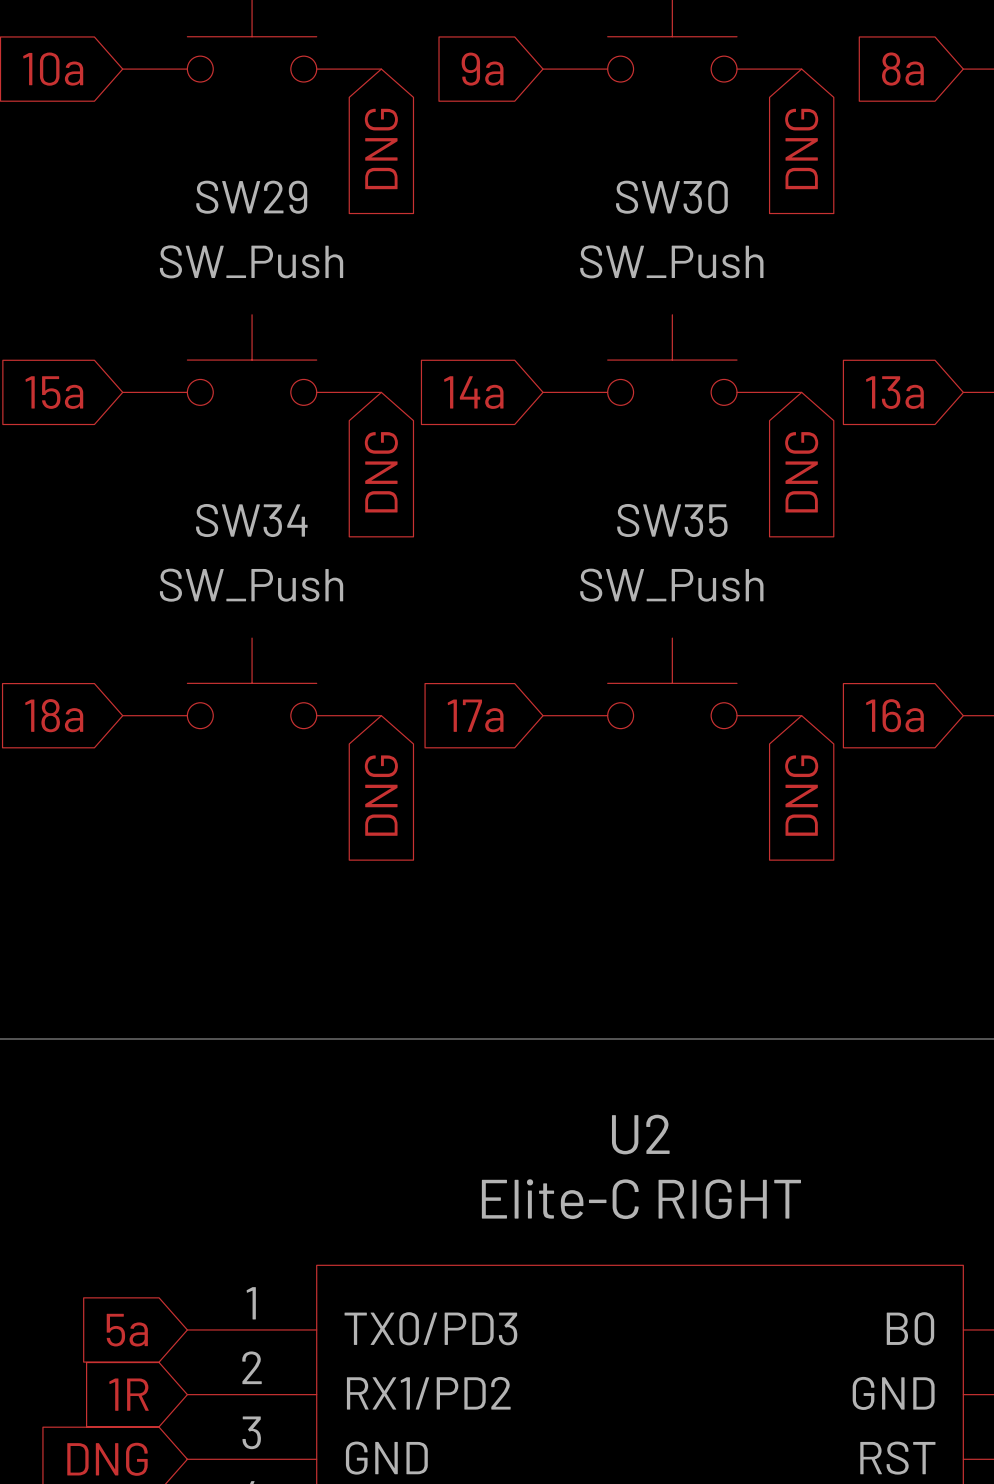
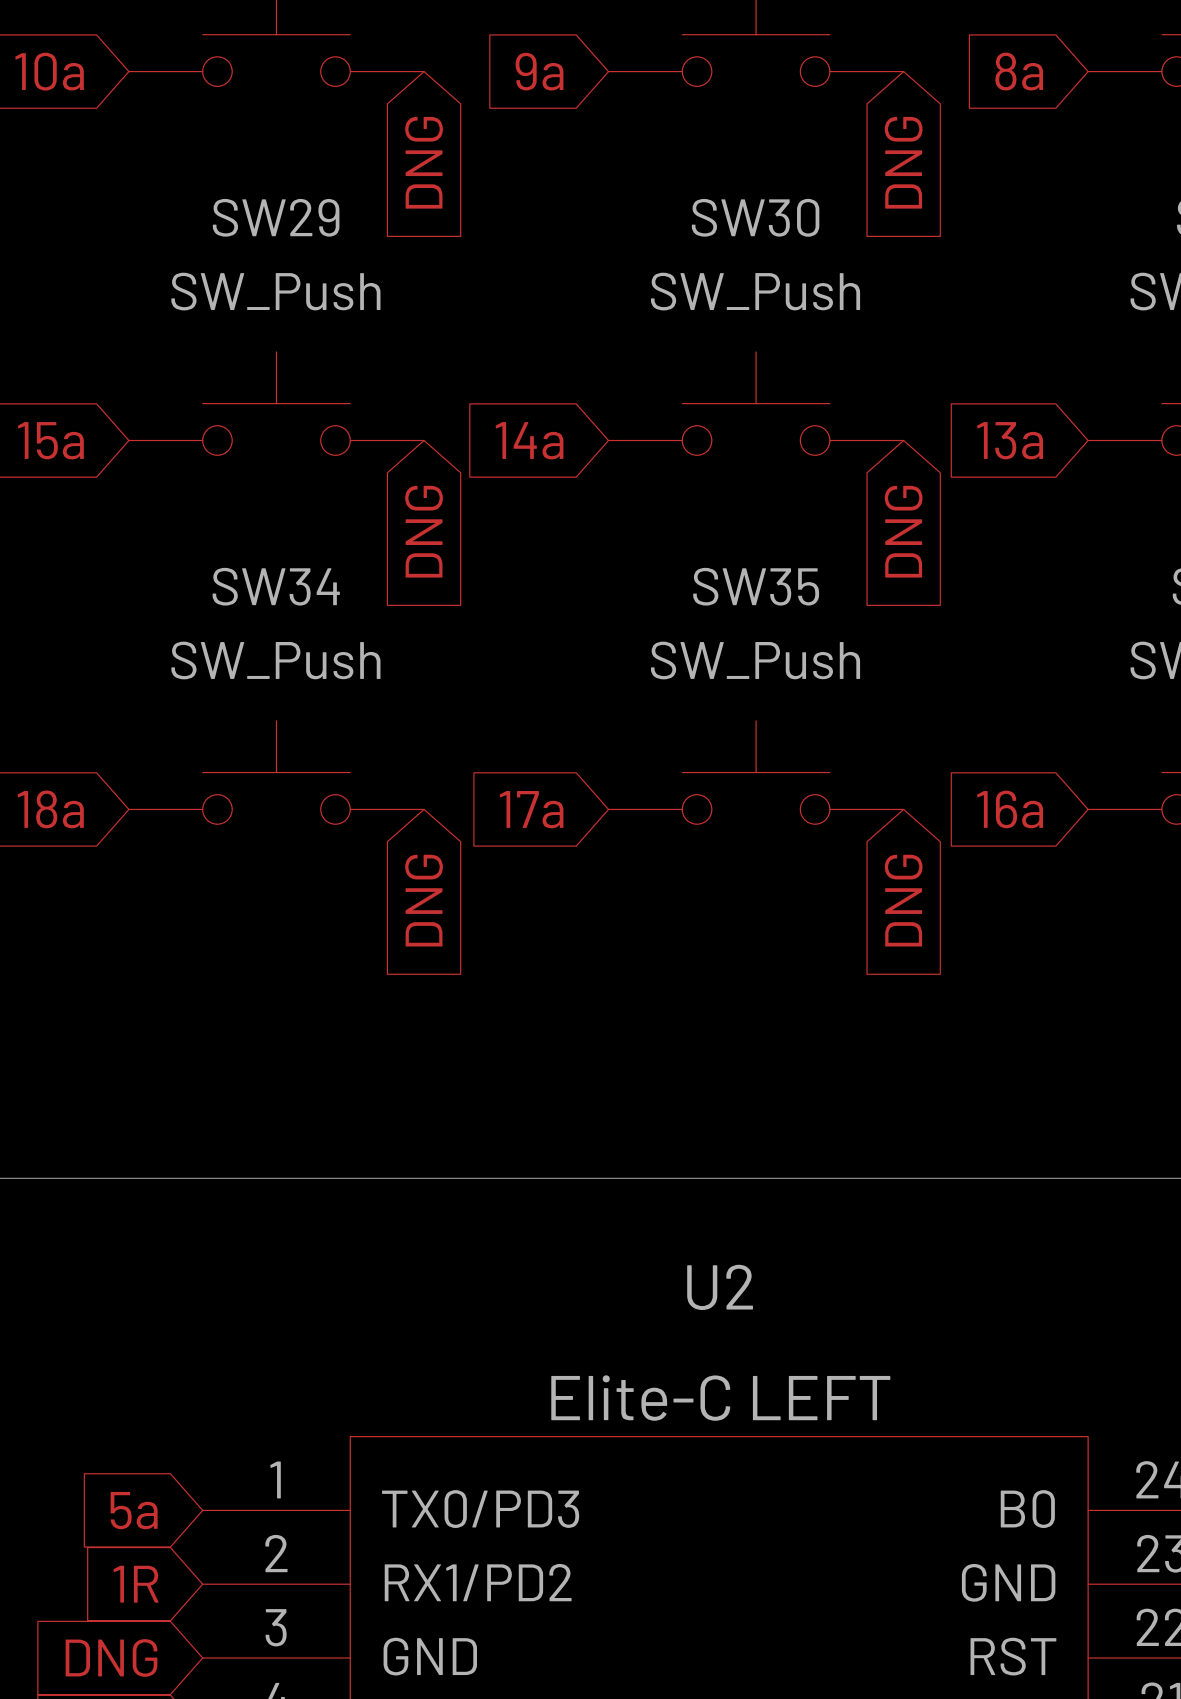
U2 value: Elite-C RIGHT (641, 1199) -> Elite-C LEFT (720, 1398)

